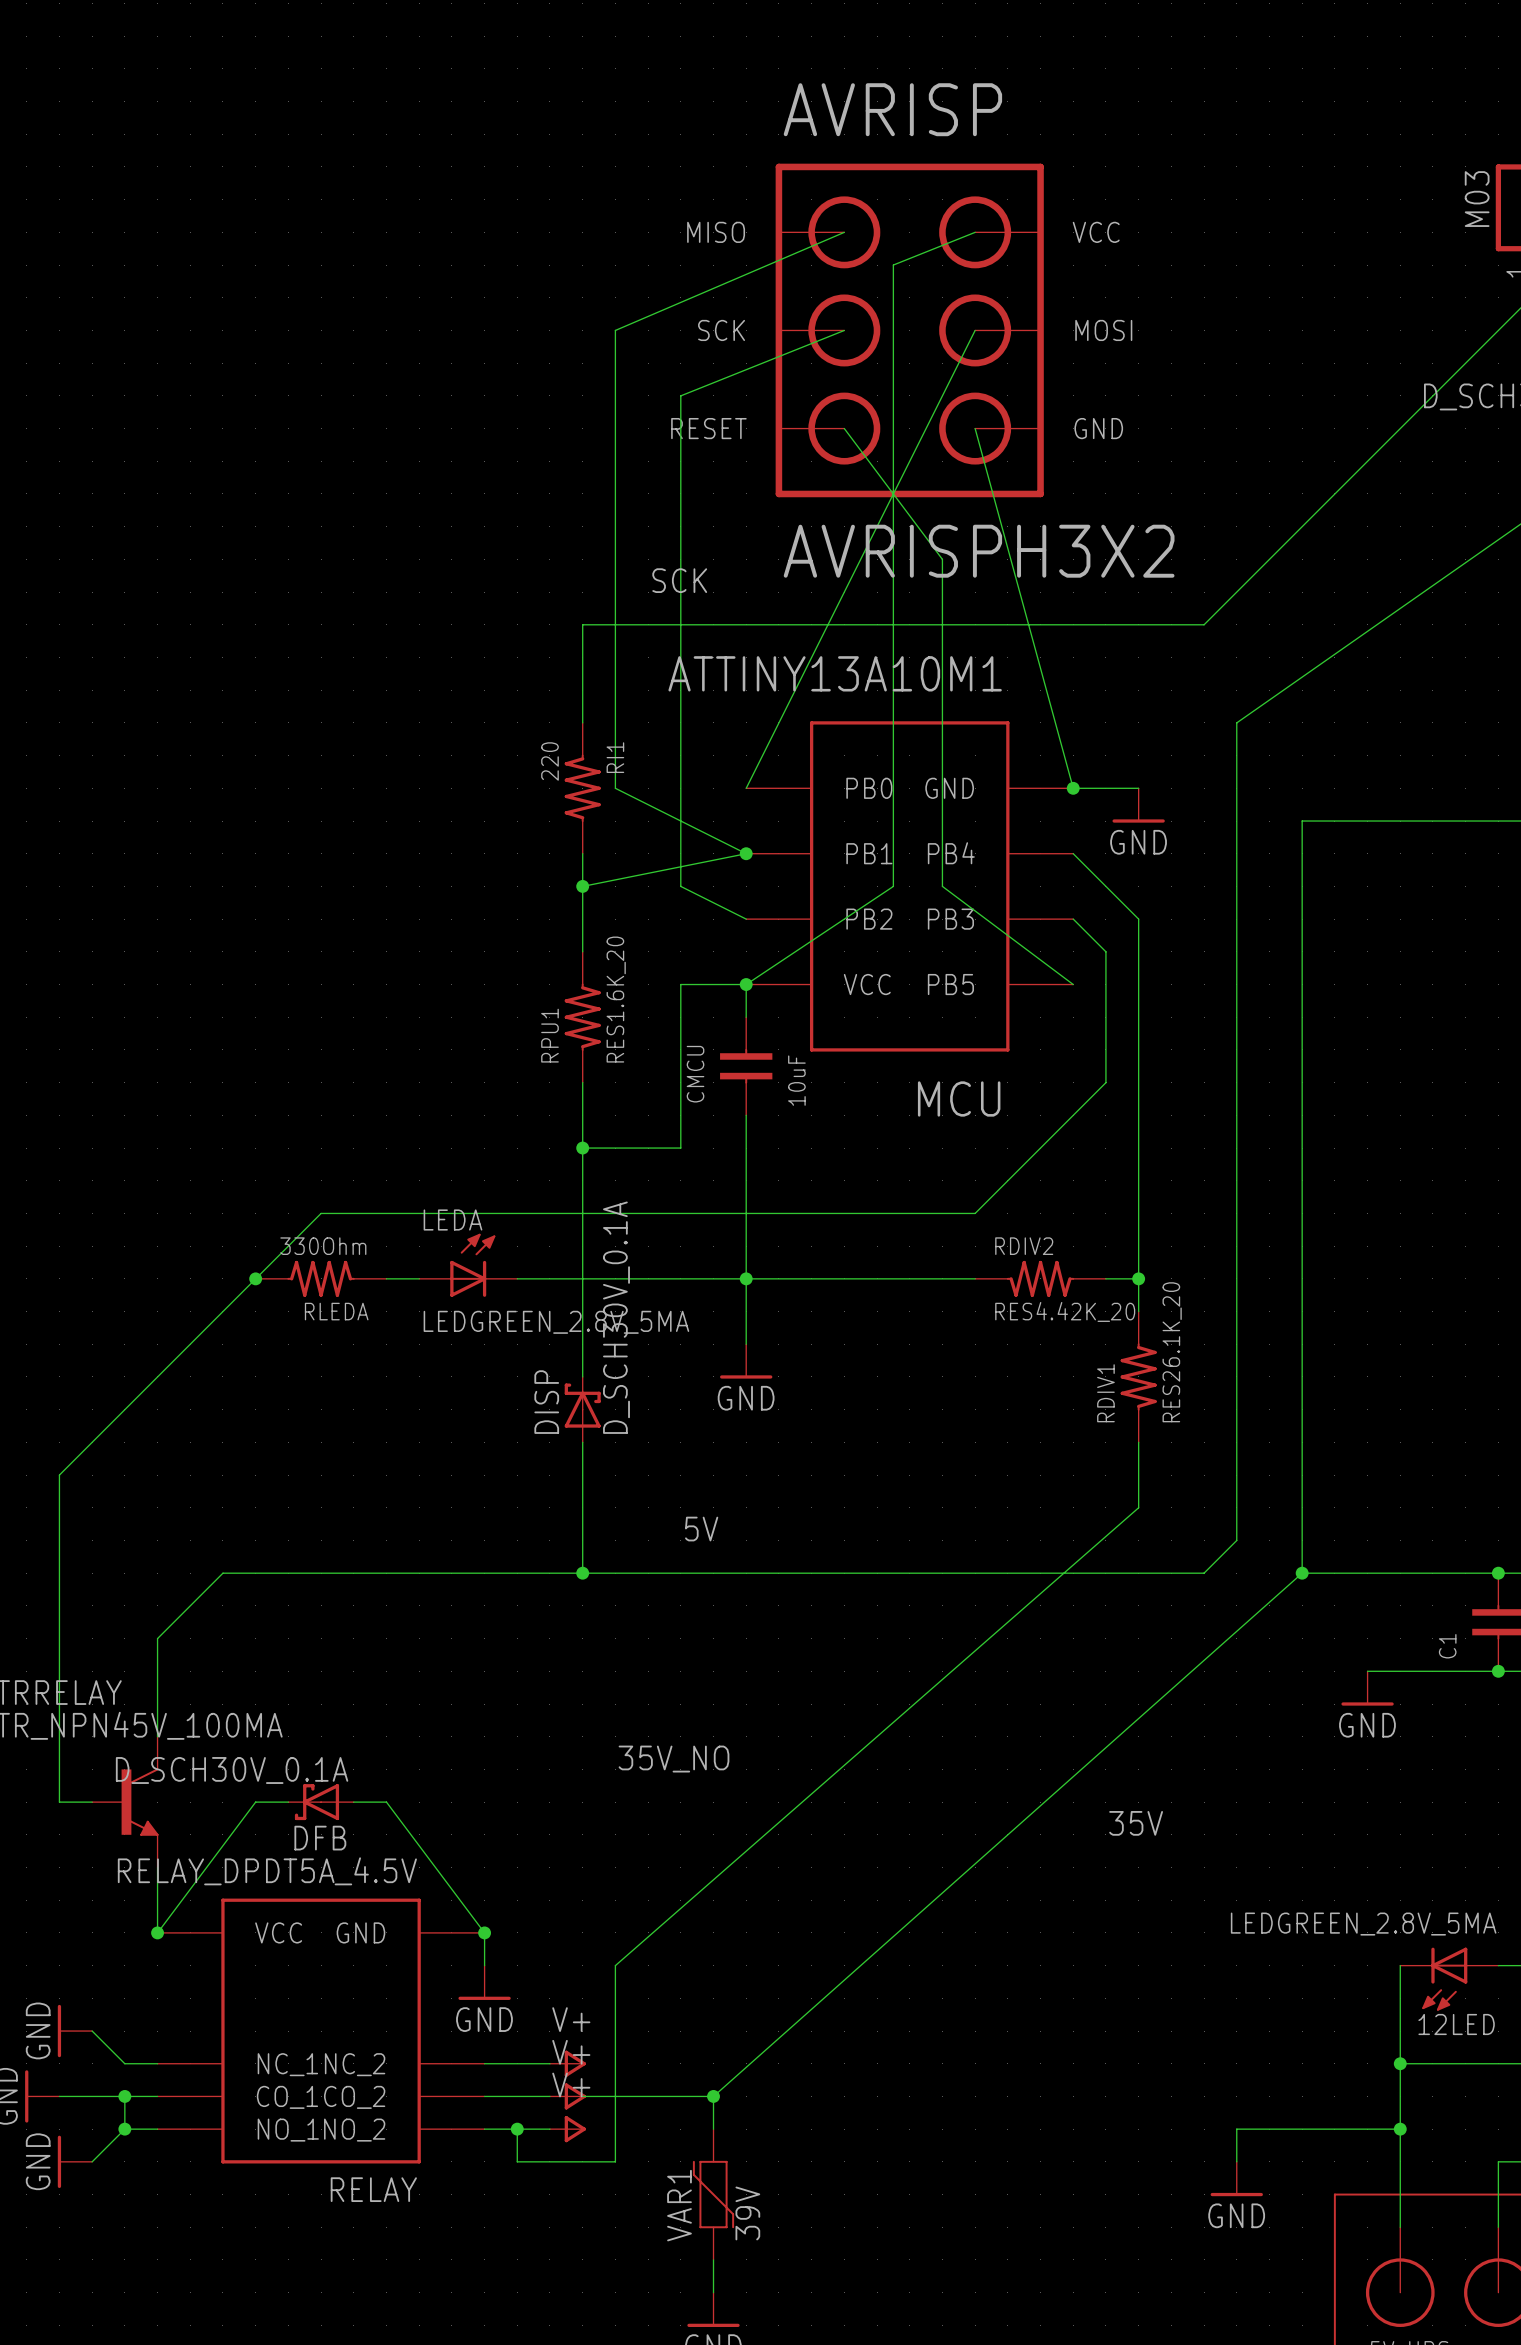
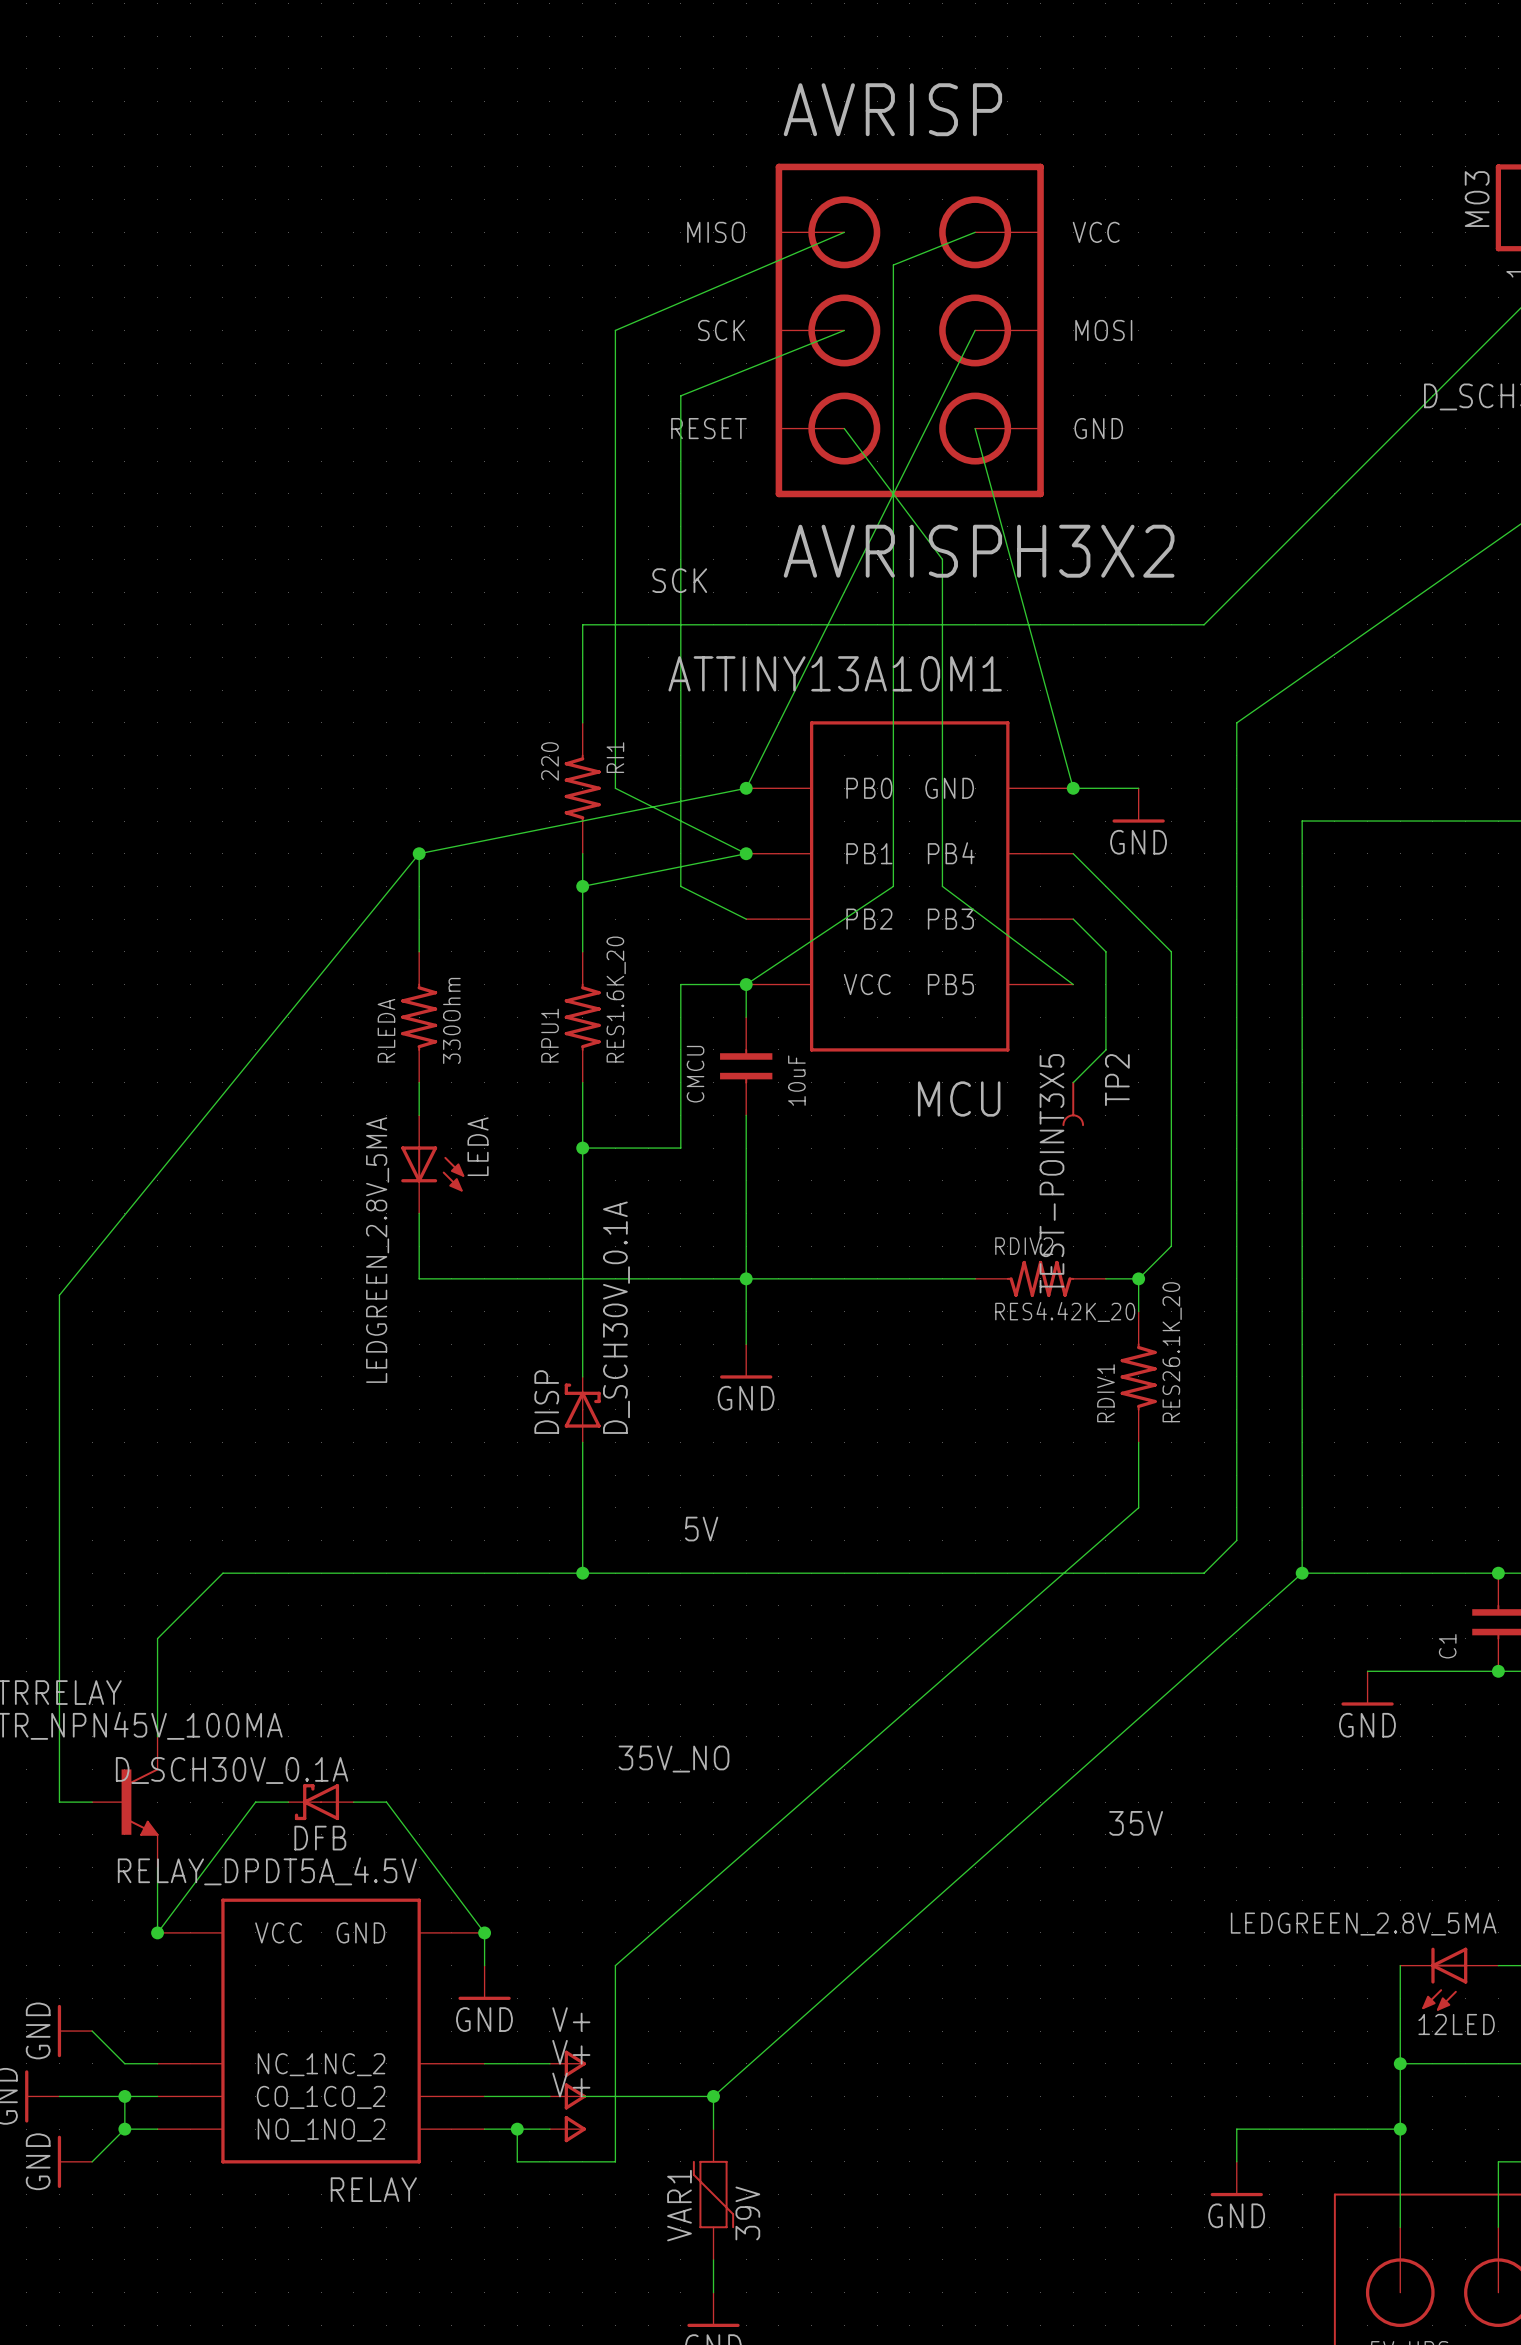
wire: none -> (746, 788) (419, 853)
junction: none -> (746, 788)
wire: none -> (419, 853) (419, 951)
junction: none -> (419, 853)
wire: (1138, 919) (1138, 1278) -> (1138, 919) (1171, 951) (1171, 1246) (1138, 1278)
wire: (1105, 1049) (1105, 1082) (975, 1213) (321, 1213) (59, 1475) -> (419, 853) (59, 1295) (59, 1475)
wire: none -> (1105, 1049) (1073, 1082)
wire: none -> (419, 1082) (419, 1115)
TP2: none -> TEST-POINT3X5 (1073, 1103)
wire: none -> (419, 1213) (419, 1278) (517, 1278)
LEDA position: (468, 1265) -> (432, 1164)
LEDA rotation: 0° (472, 1265) -> 90° clockwise (432, 1168)
junction: (255, 1278) -> none
RLEDA rotation: 0° (321, 1278) -> 90° clockwise (419, 1017)
RLEDA position: (321, 1278) -> (419, 1017)
wire: (386, 1278) (419, 1278) -> none

